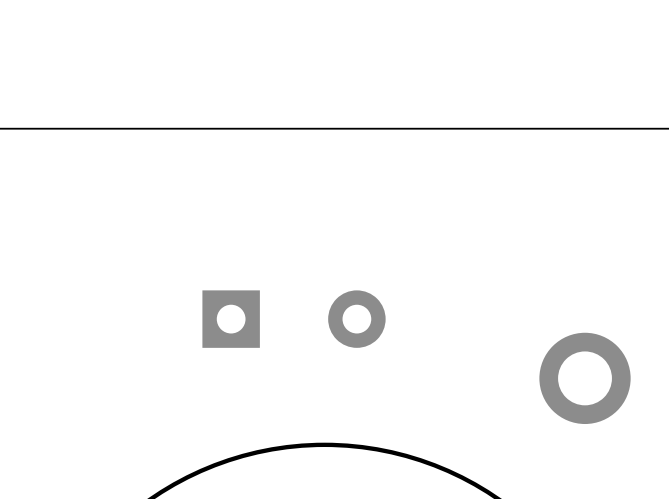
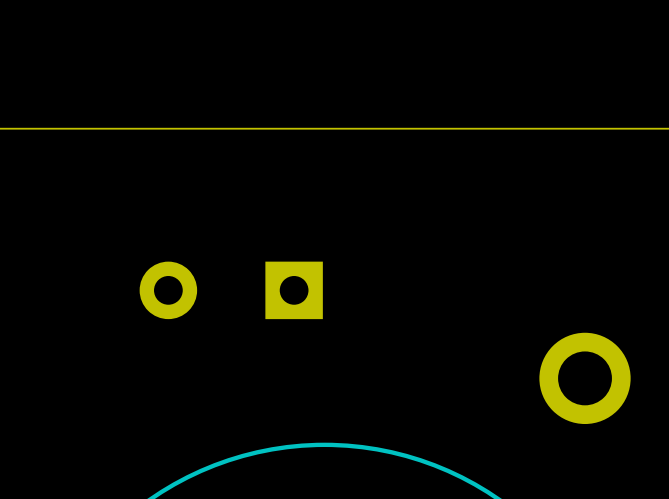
part rotation: 0° (294, 319) -> 180° (231, 290)

